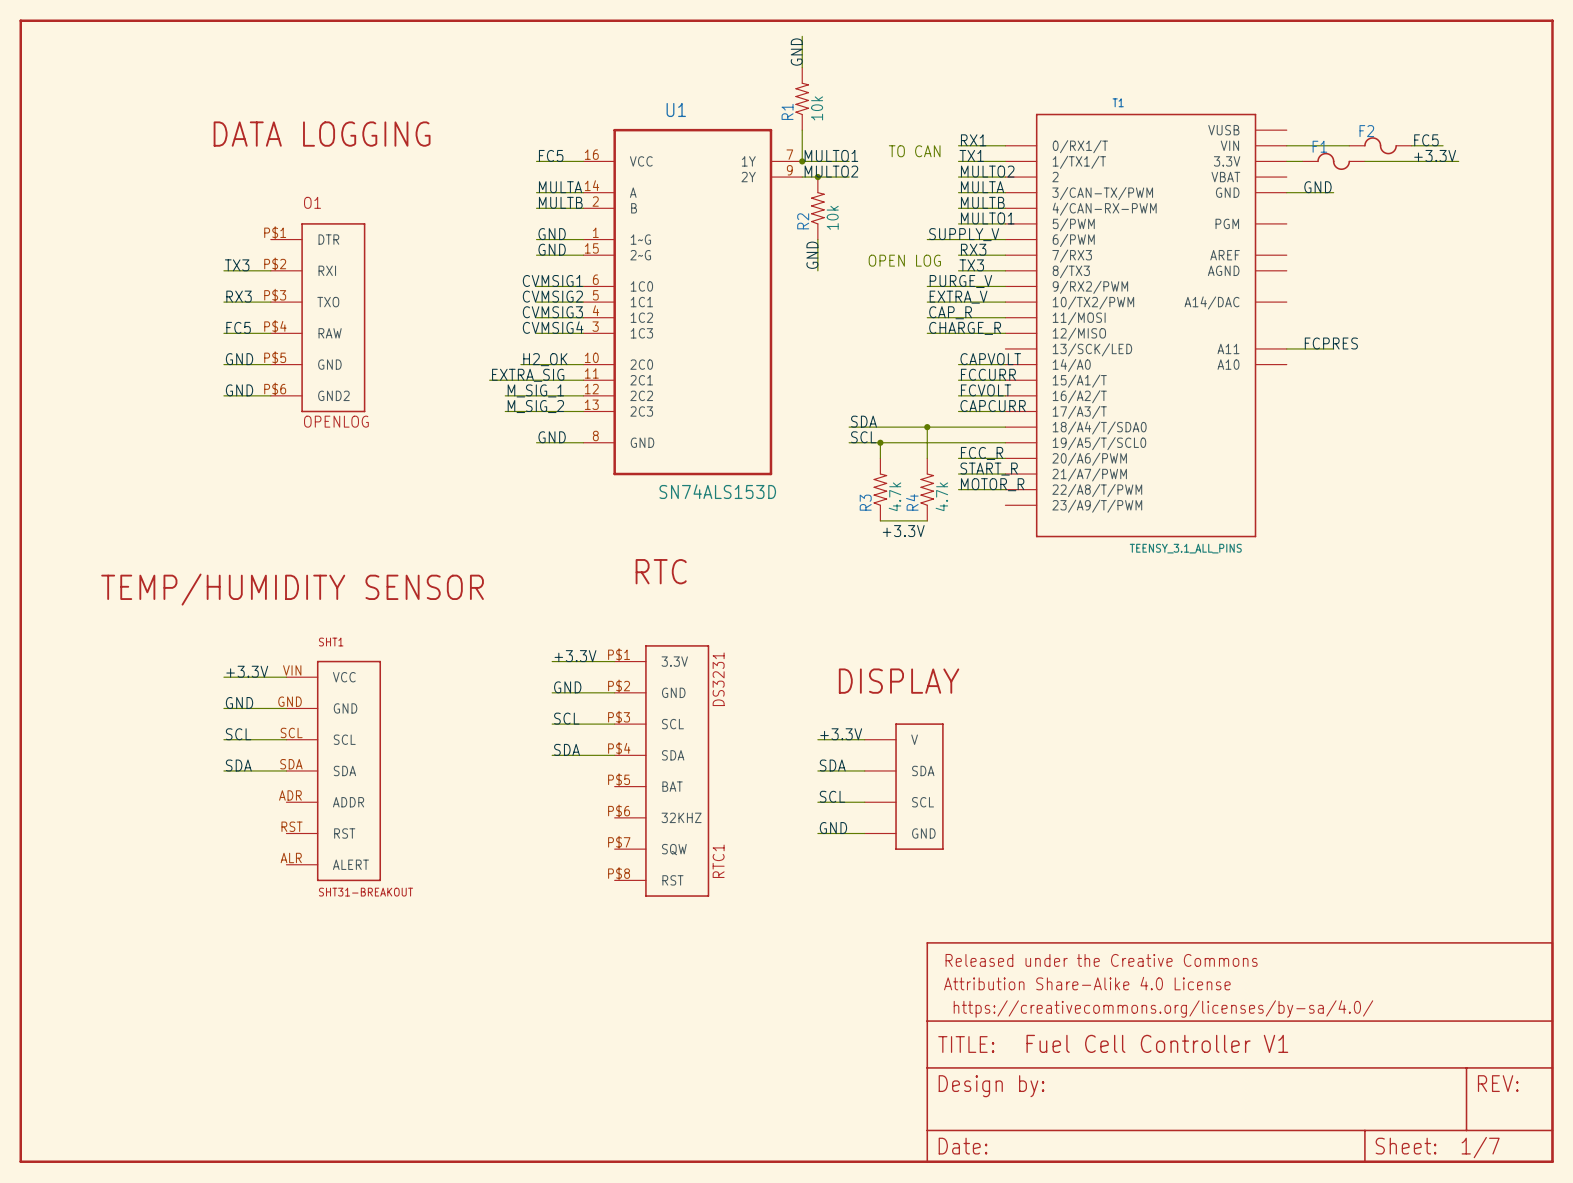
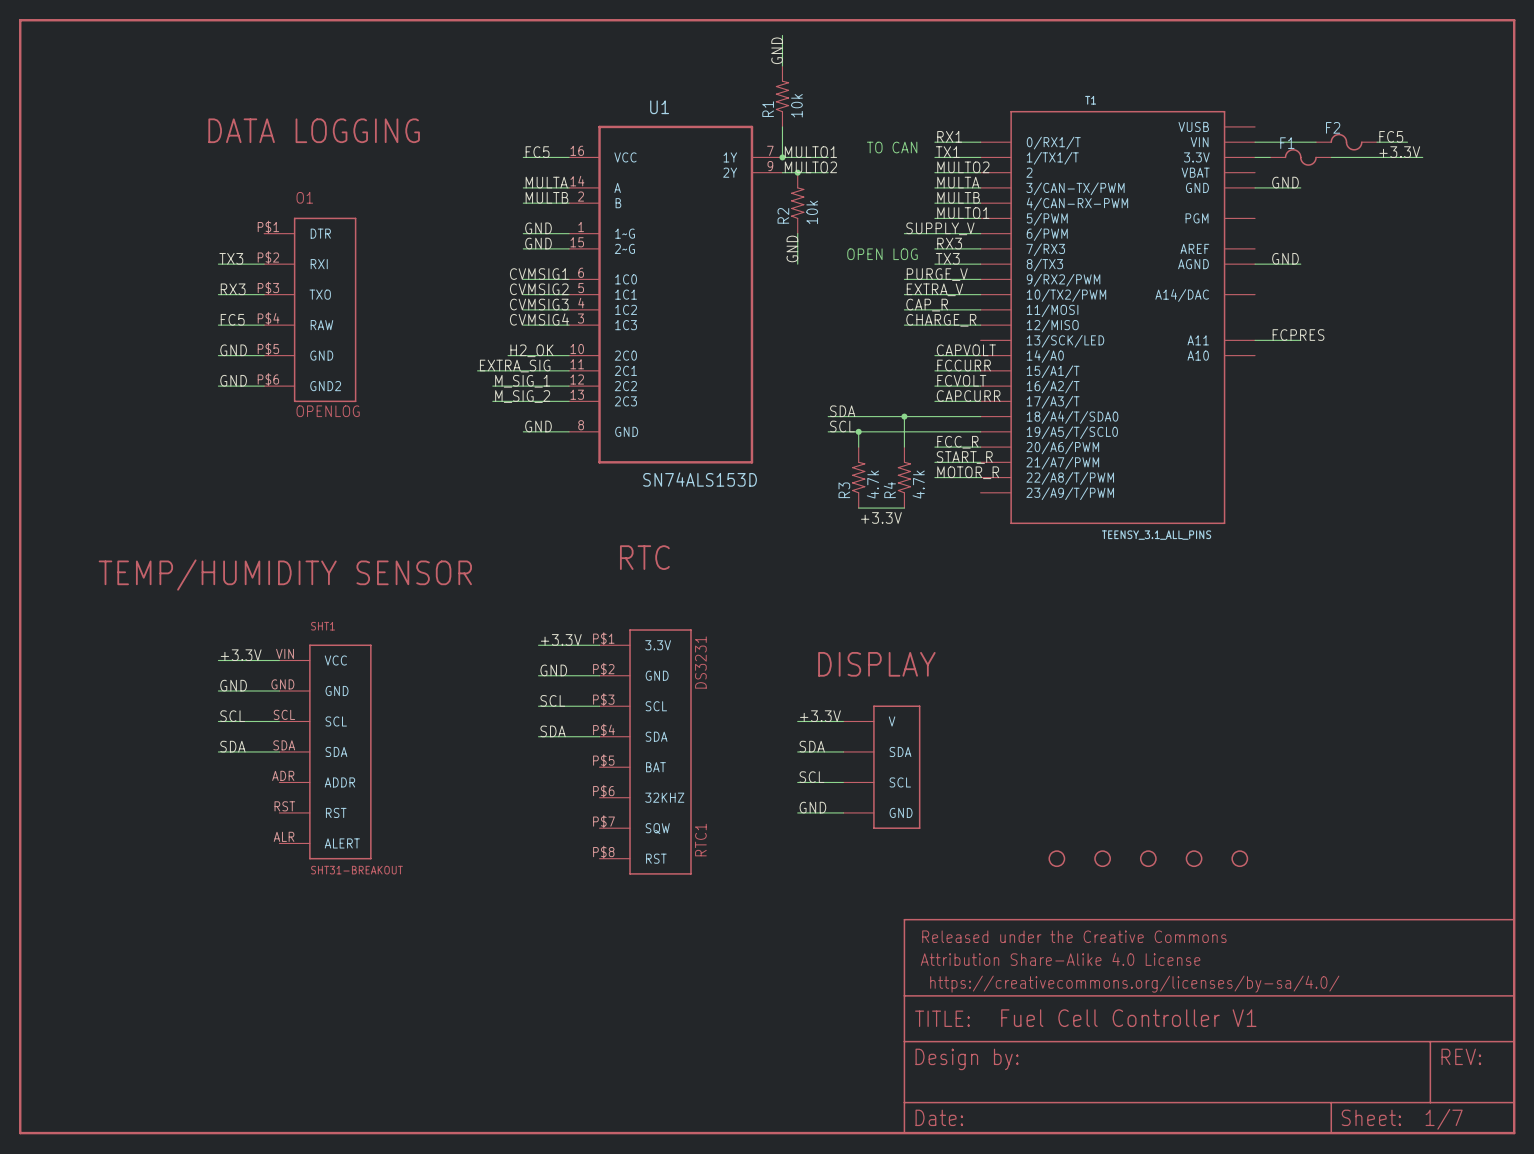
label: none -> GND (1285, 258)
wire: none -> (1255, 264) (1300, 264)
part: none -> (1056, 858)
part: none -> (1102, 858)
part: none -> (1148, 858)
part: none -> (1194, 858)
part: none -> (1239, 858)

